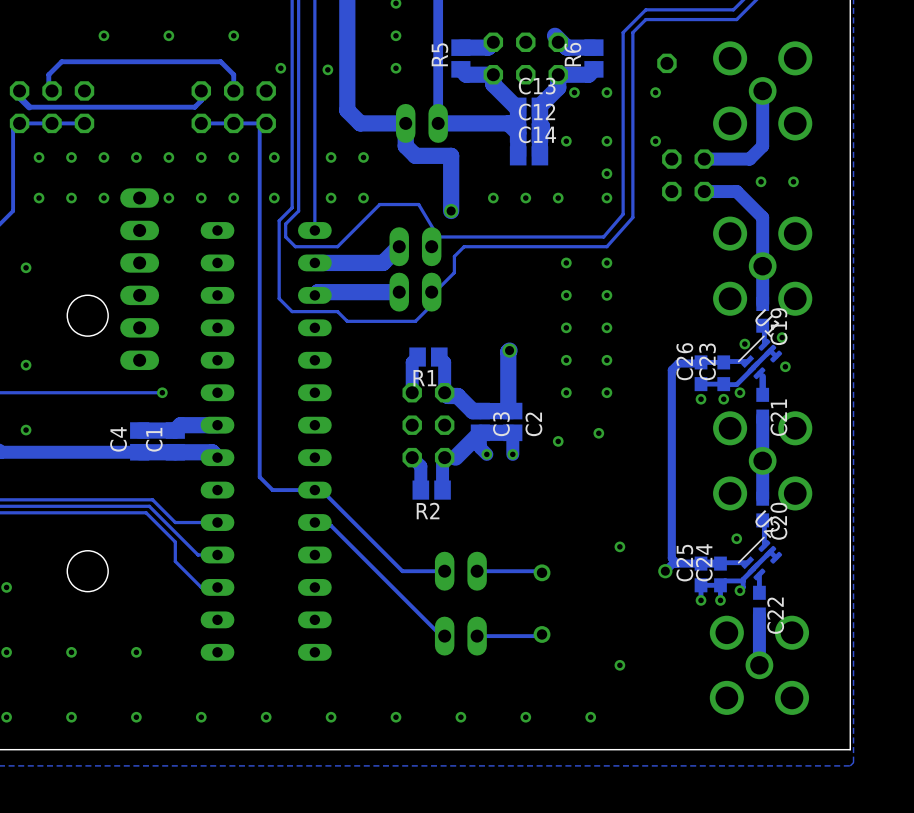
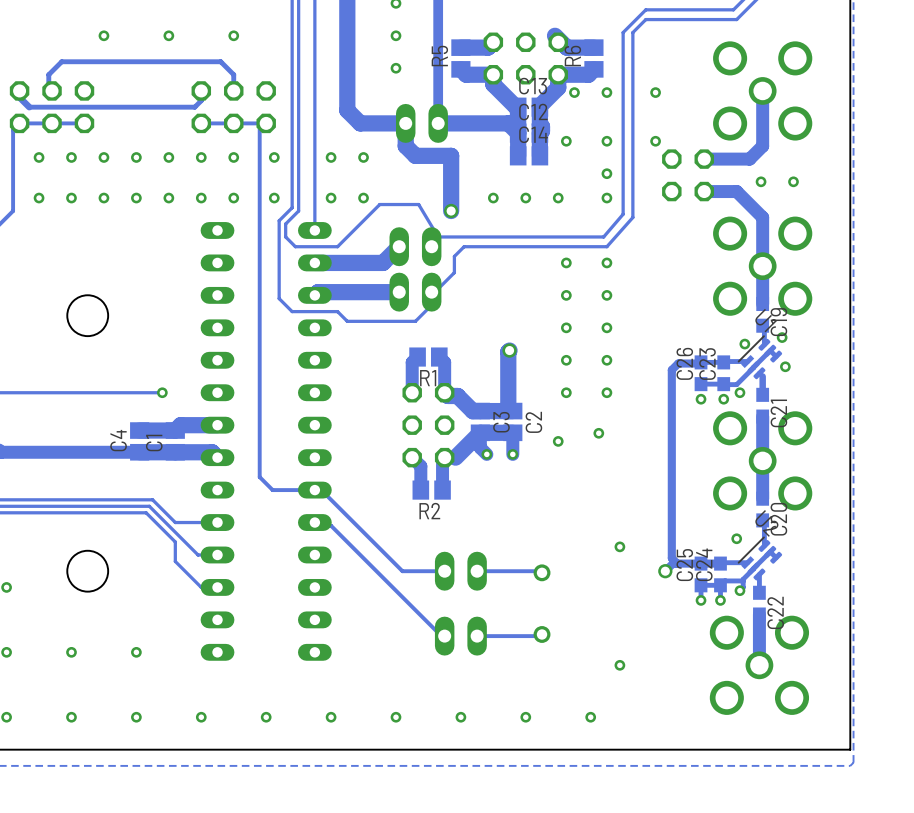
part: (666, 63) -> none
via: (280, 68) -> none
via: (327, 69) -> none
via: none -> (136, 198)
via: (26, 267) -> none
part: (139, 279) -> none
via: (26, 365) -> none
via: (26, 430) -> none

